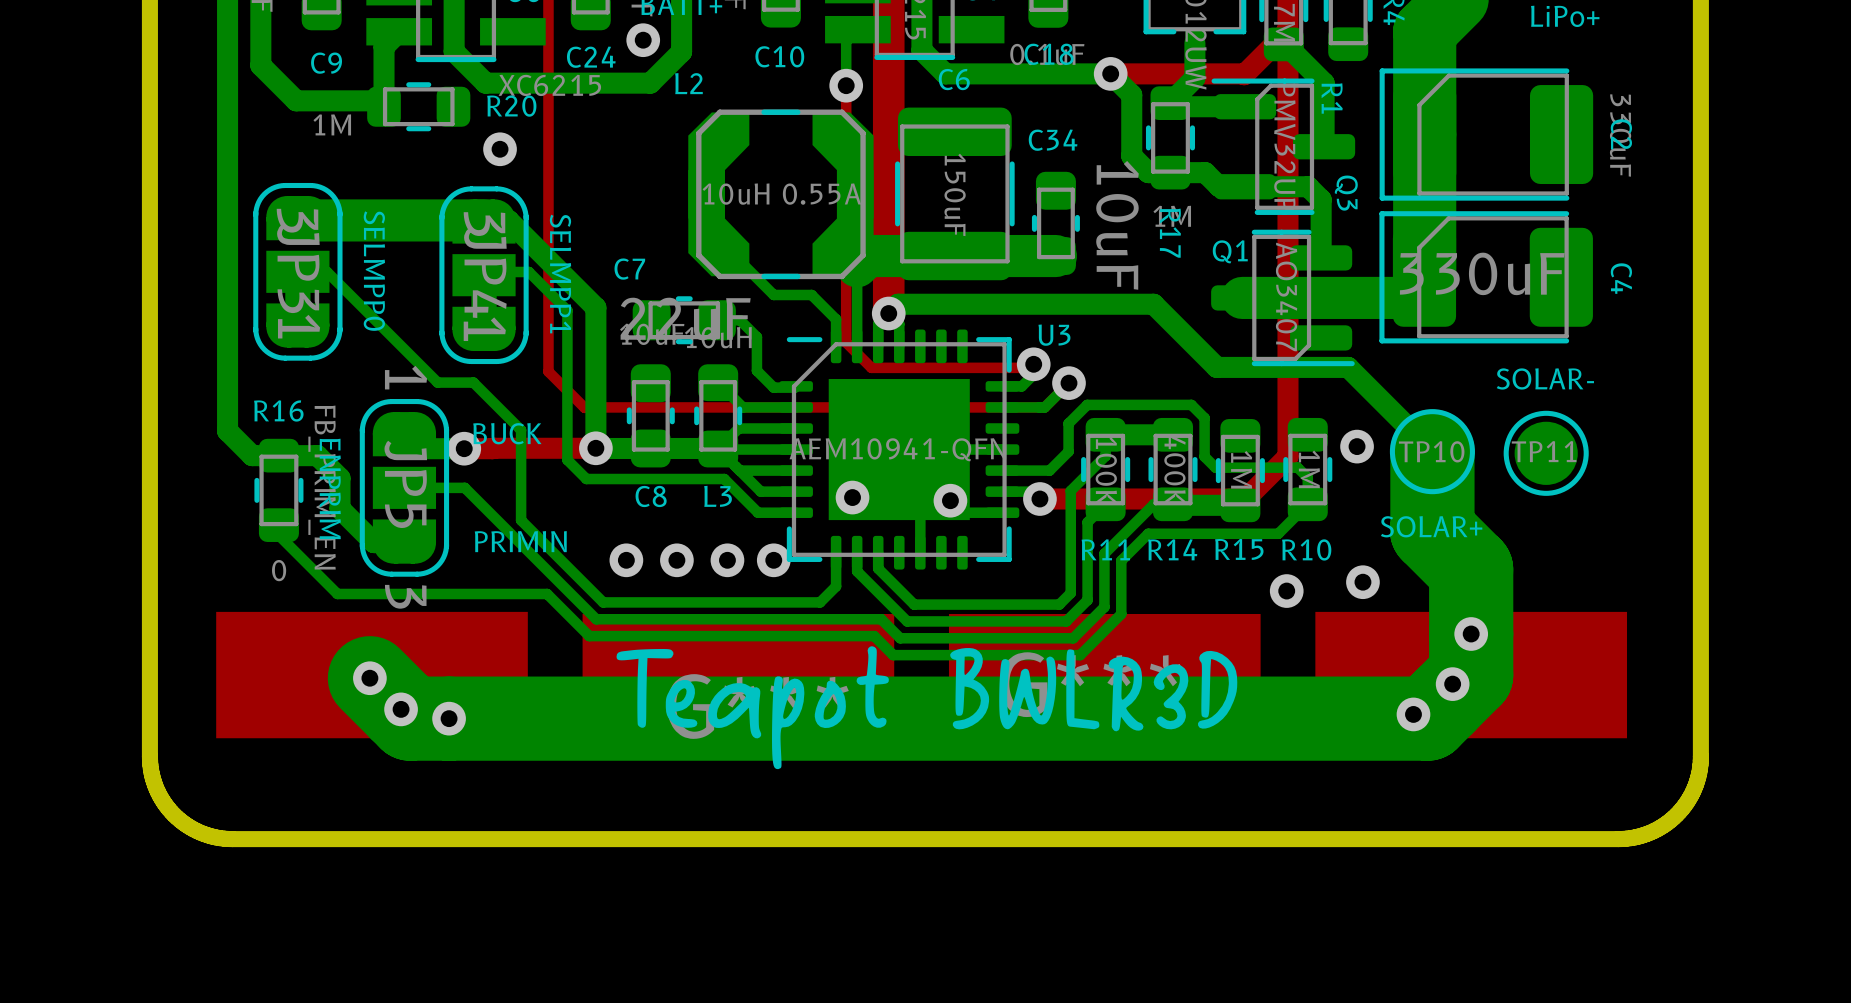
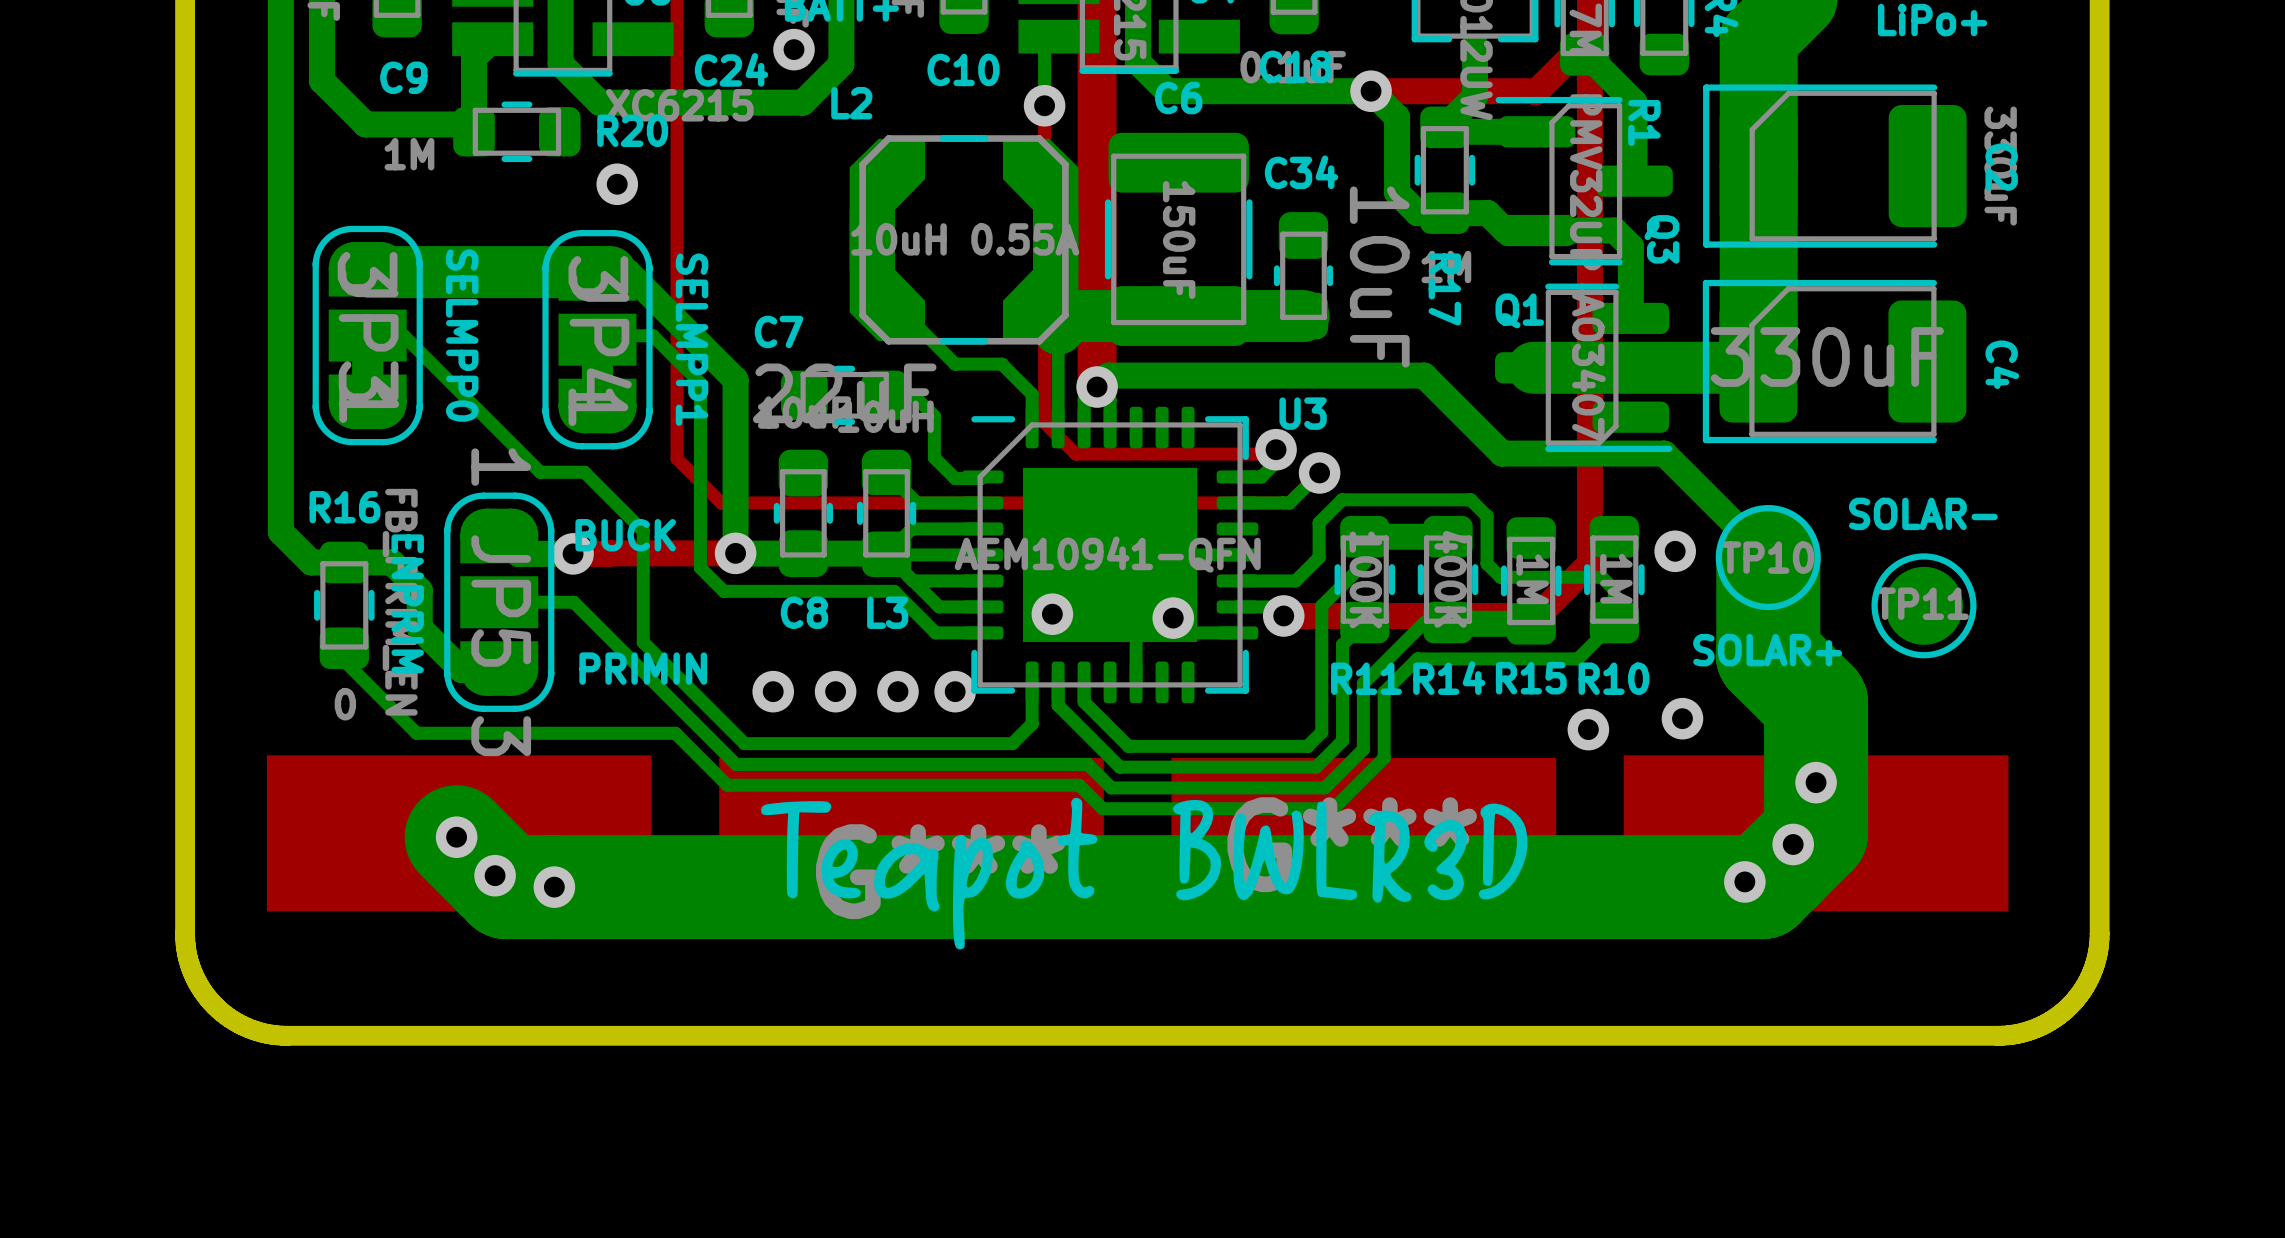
C4 position: (1486, 277) -> (1834, 361)
TP11 position: (1546, 453) -> (1924, 605)

